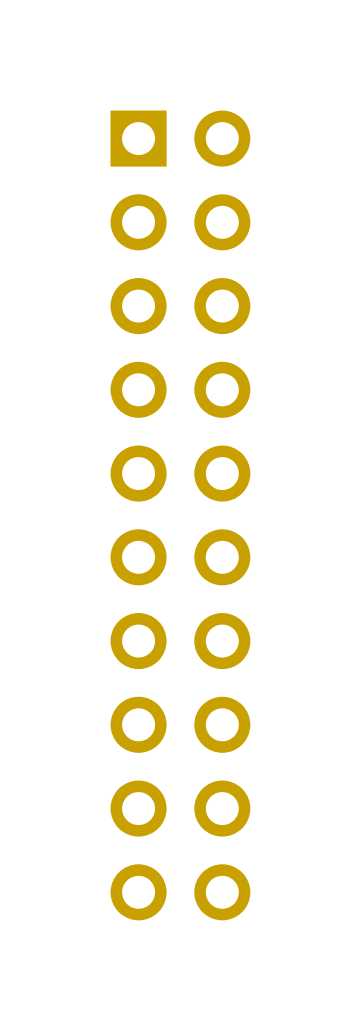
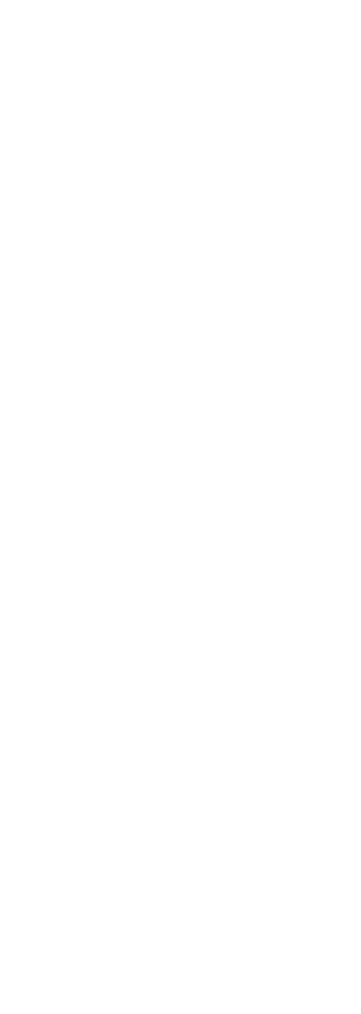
part: (180, 515) -> none

